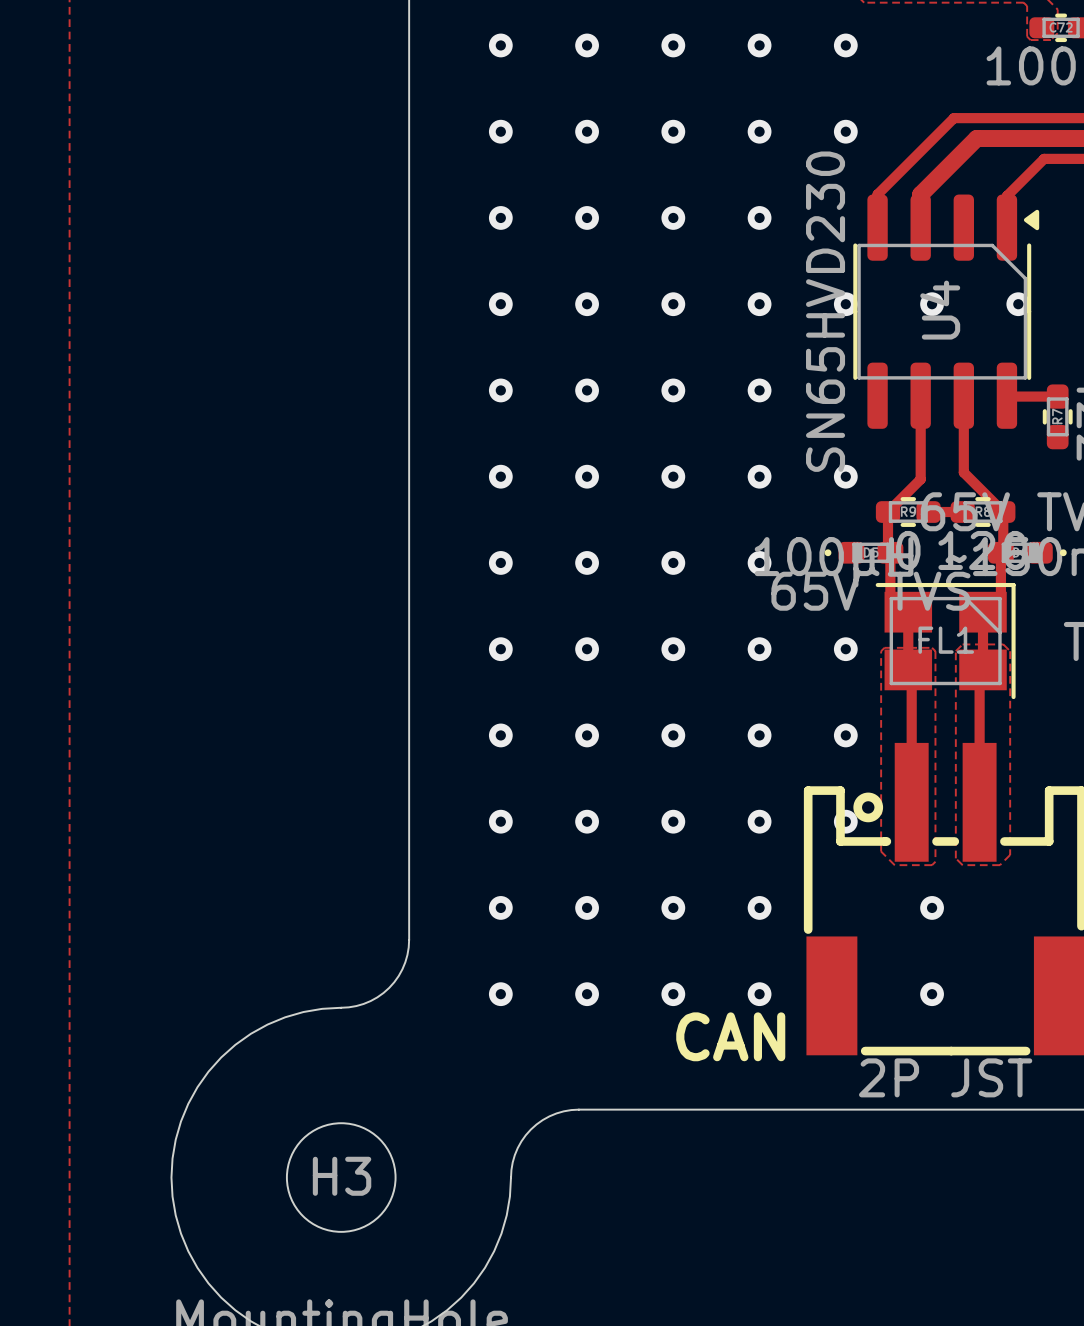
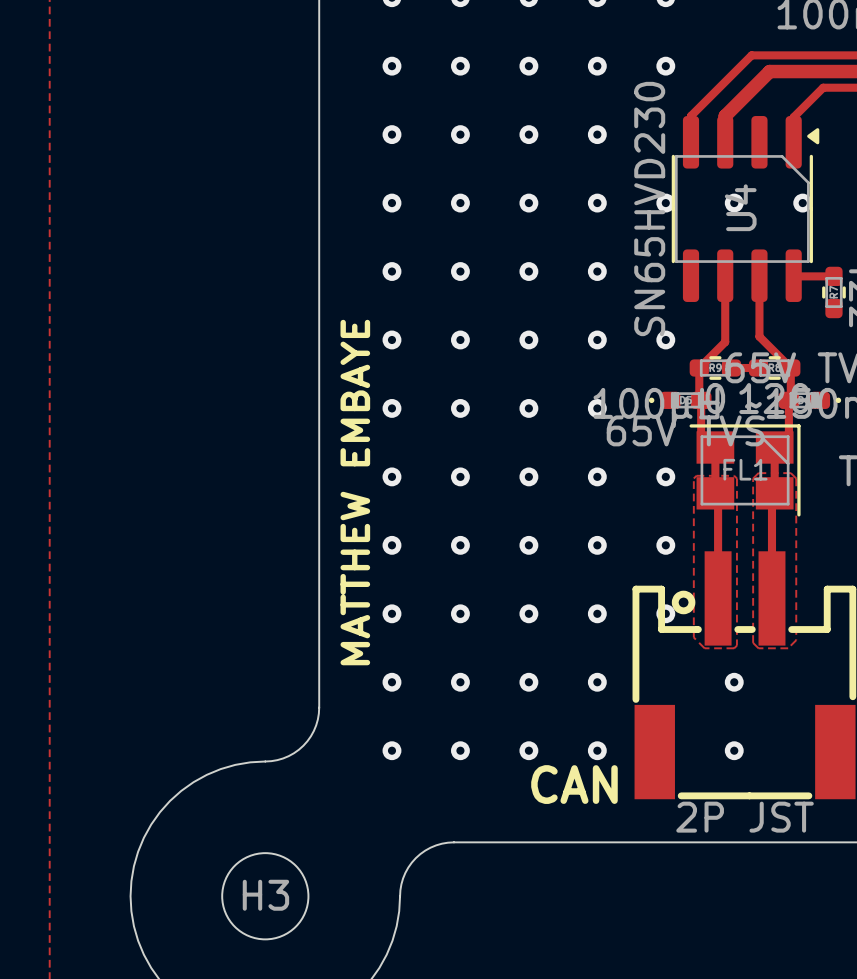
text: none -> MATTHEW EMBAYE (355, 492)

